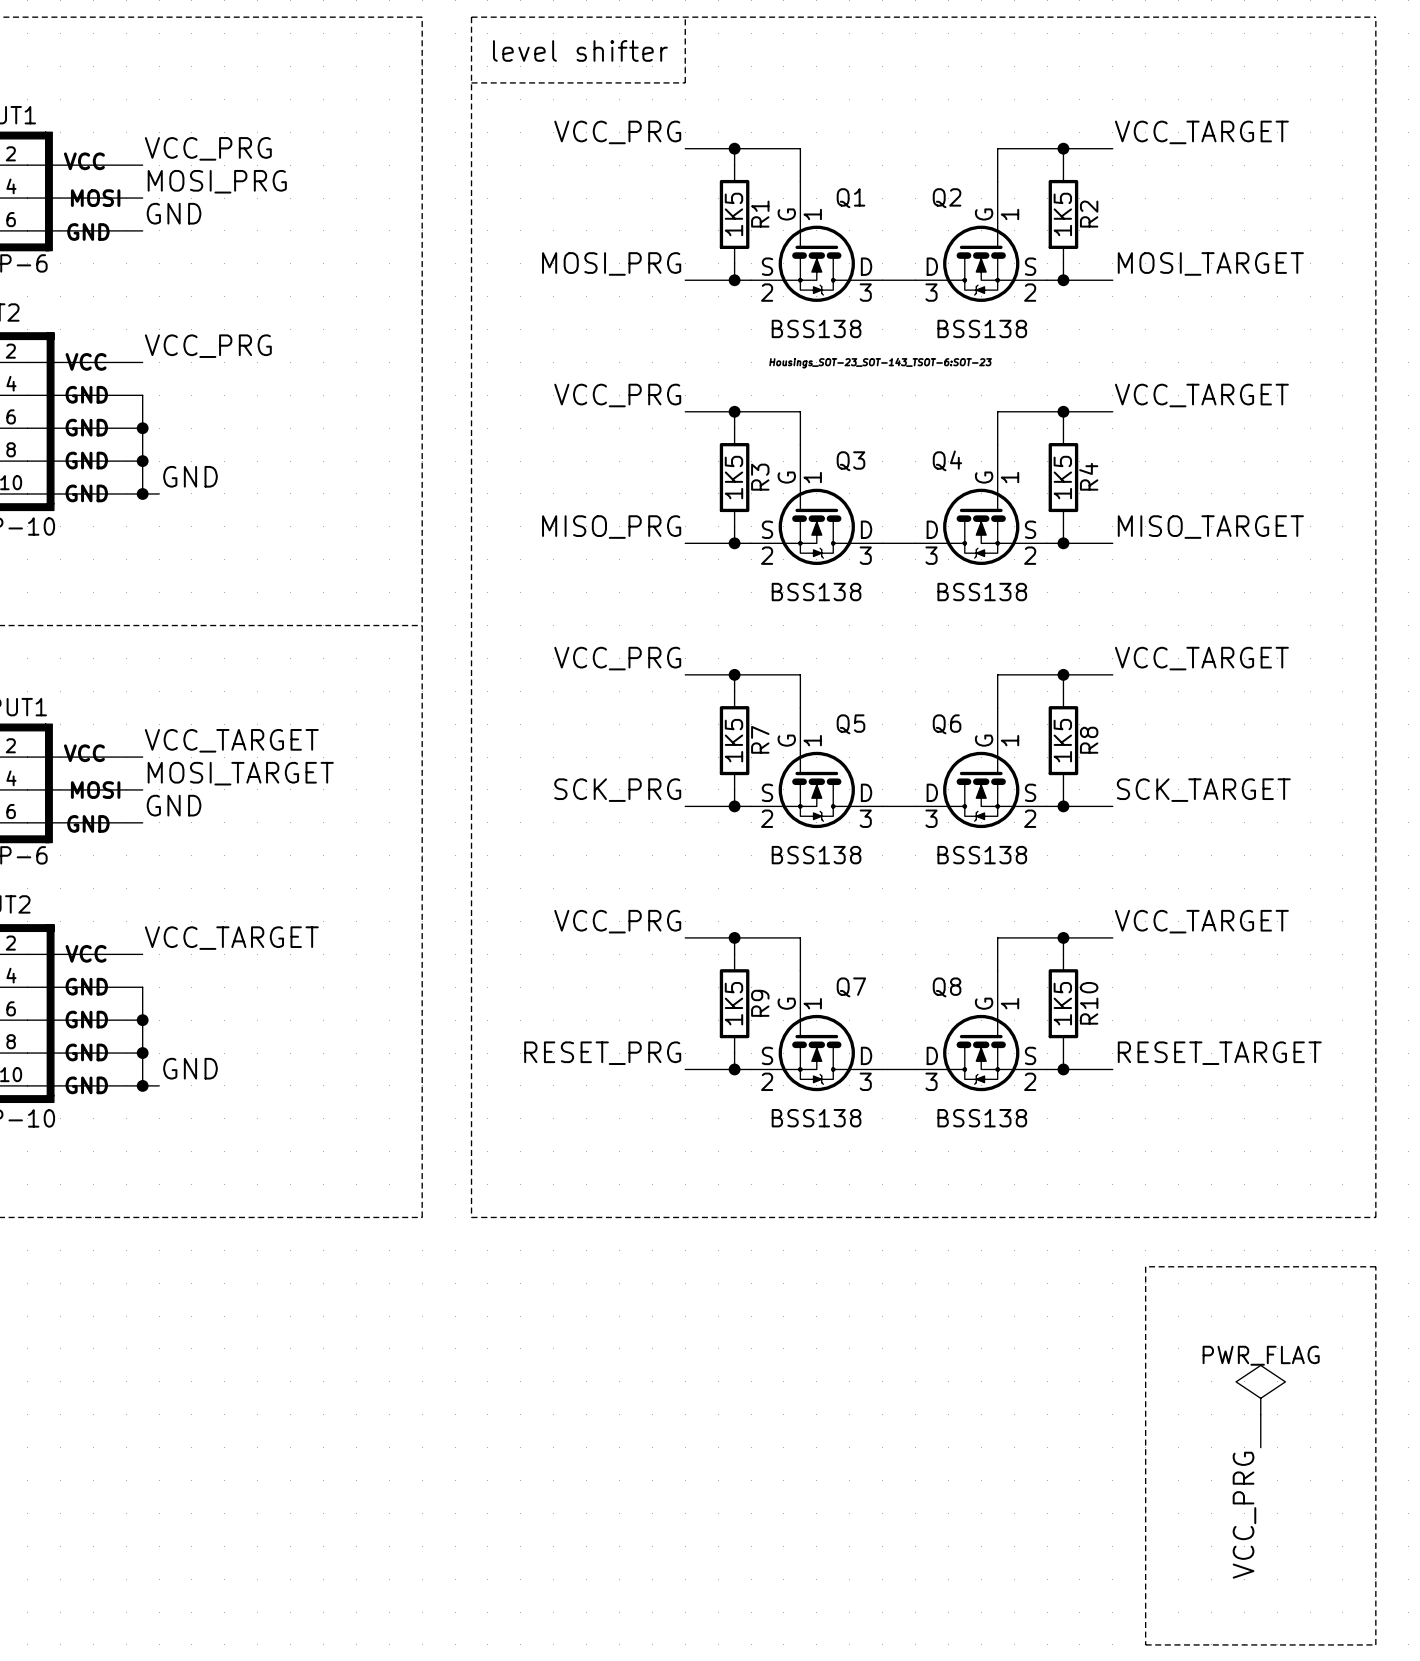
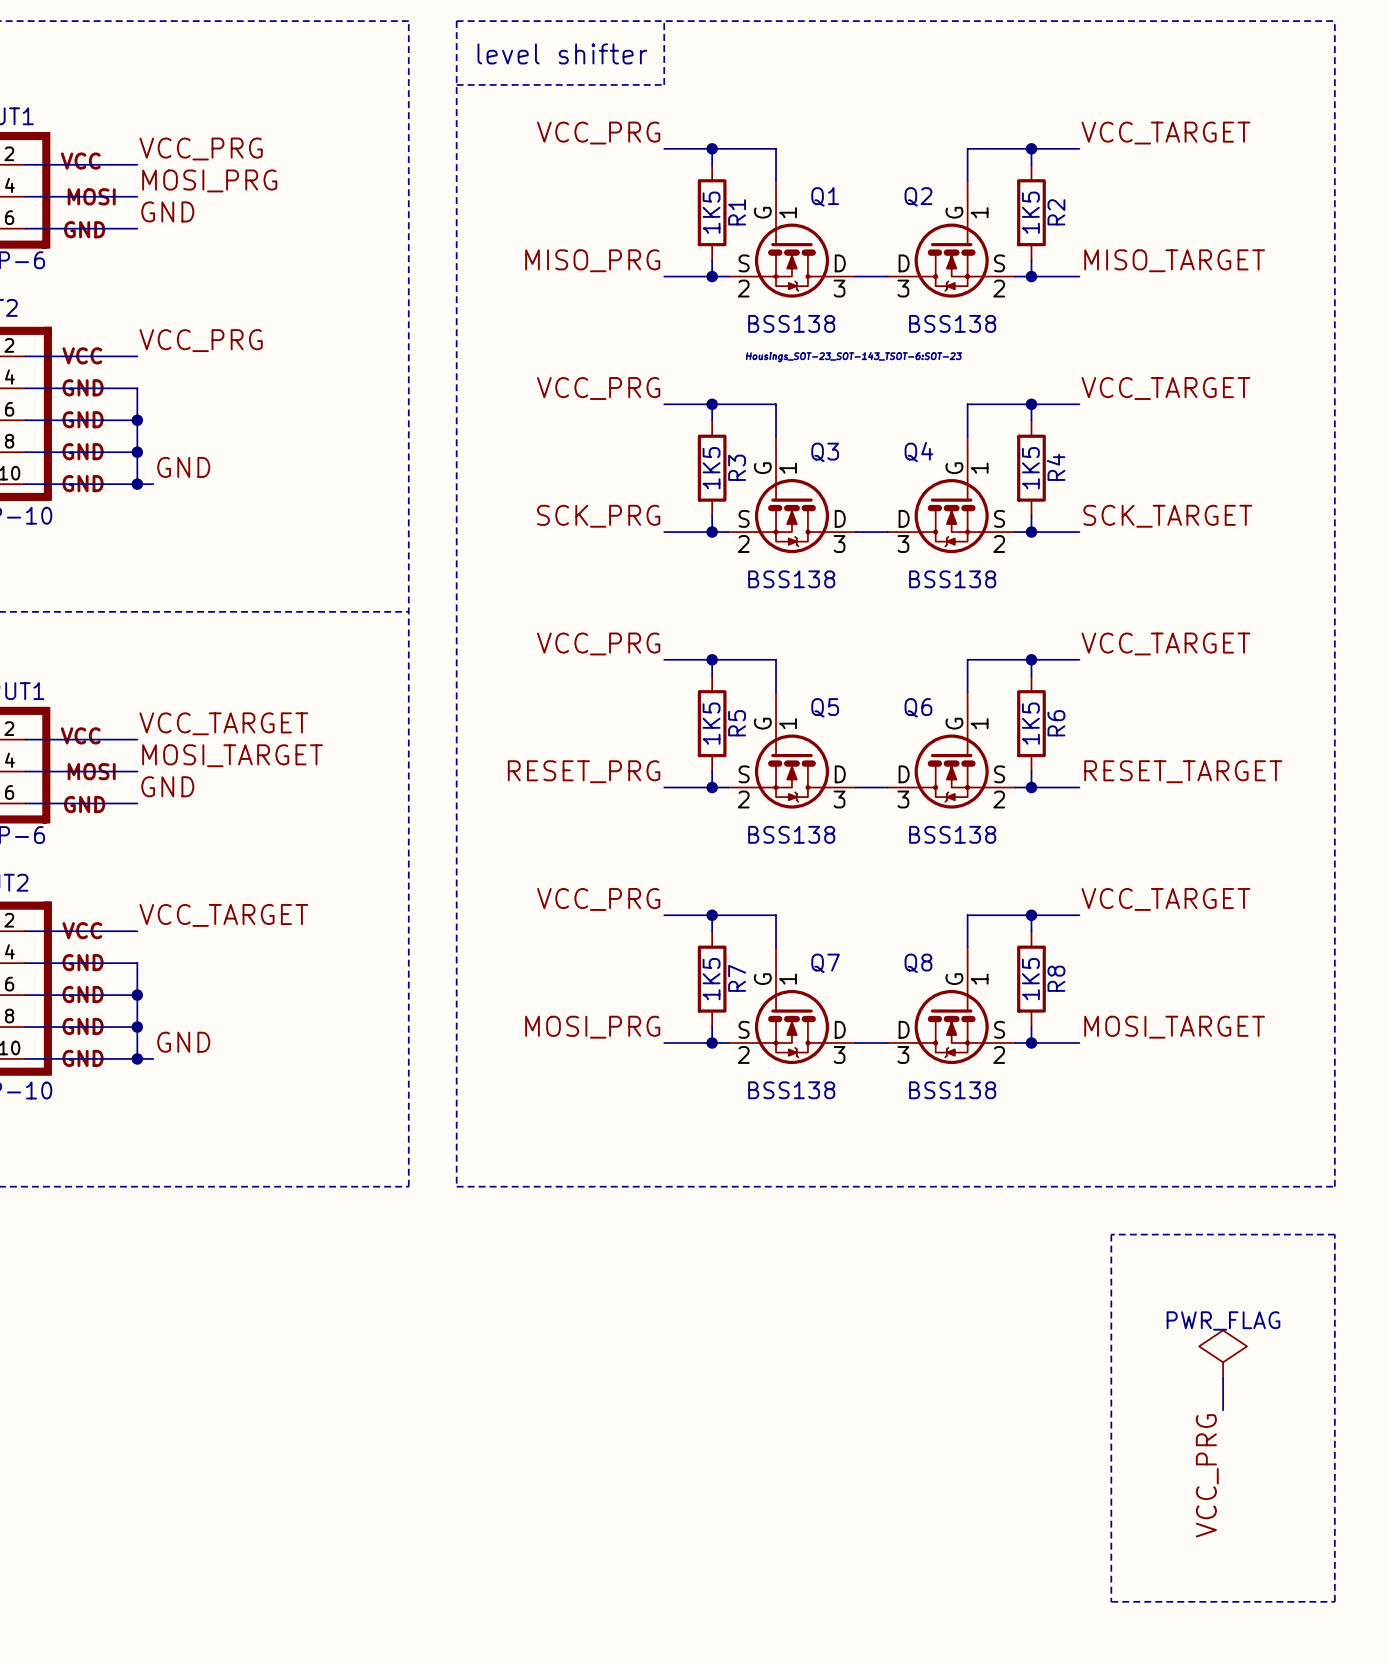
label: MOSI_PRG (611, 263) -> MISO_PRG (592, 260)
label: MOSI_TARGET (1210, 263) -> MISO_TARGET (1174, 260)
label: MISO_PRG (611, 527) -> SCK_PRG (598, 516)
label: MISO_TARGET (1210, 527) -> SCK_TARGET (1167, 516)
R7 name: R7 (760, 739) -> R5 (737, 723)
R8 name: R8 (1089, 740) -> R6 (1056, 723)
label: SCK_PRG (617, 790) -> RESET_PRG (584, 771)
label: SCK_TARGET (1203, 790) -> RESET_TARGET (1183, 771)
R9 name: R9 (760, 1003) -> R7 (737, 978)
R10 name: R10 (1089, 1003) -> R8 (1056, 978)
label: RESET_PRG (602, 1053) -> MOSI_PRG (592, 1027)
label: RESET_TARGET (1219, 1053) -> MOSI_TARGET (1174, 1027)

